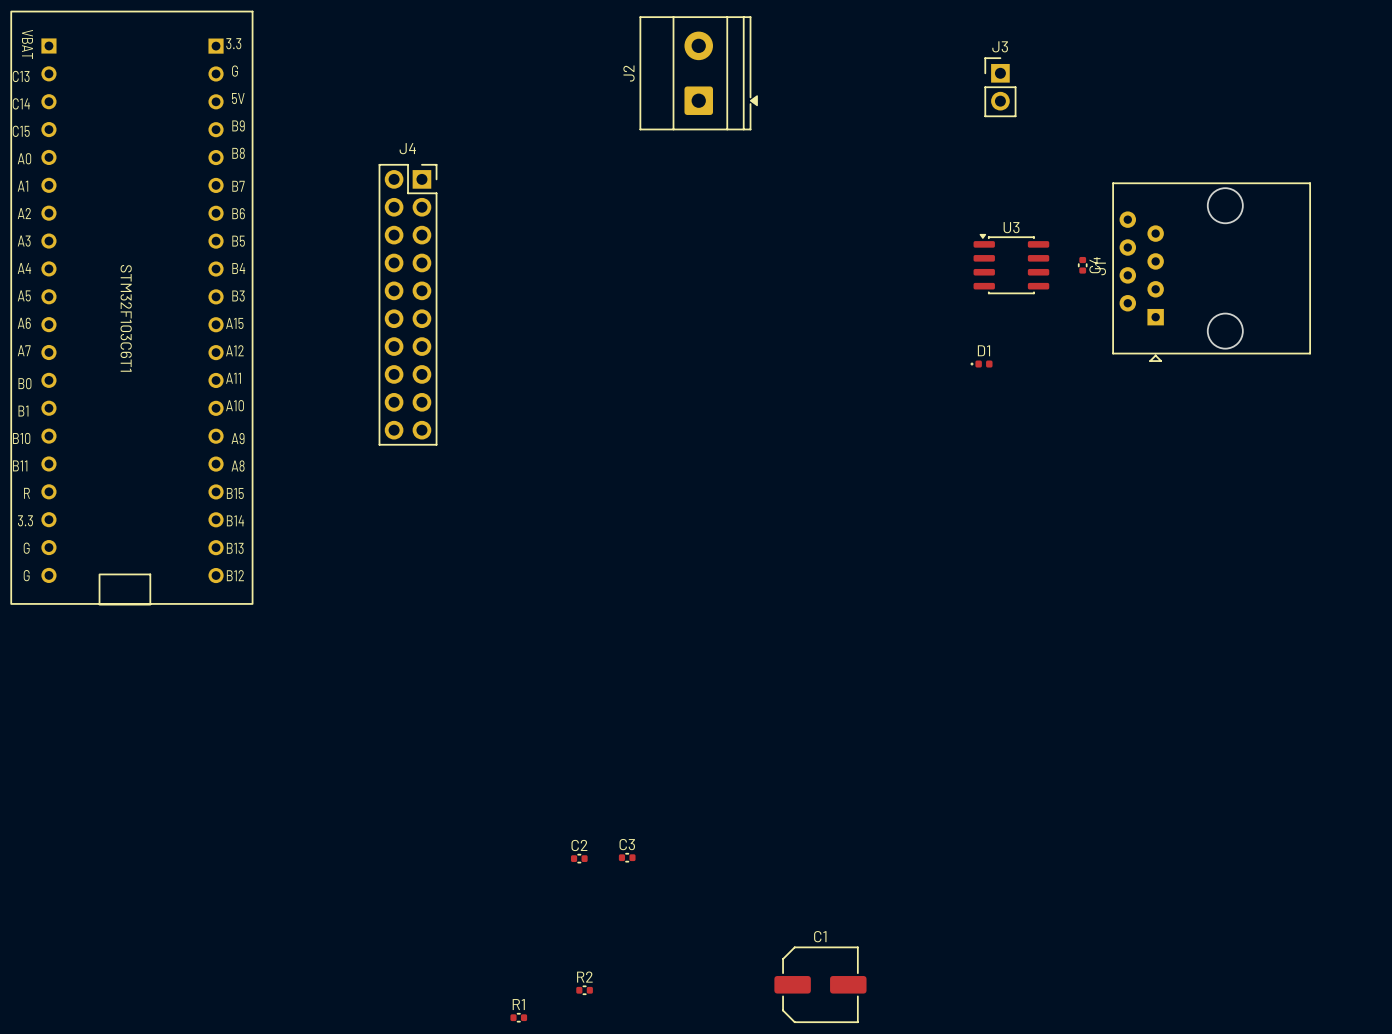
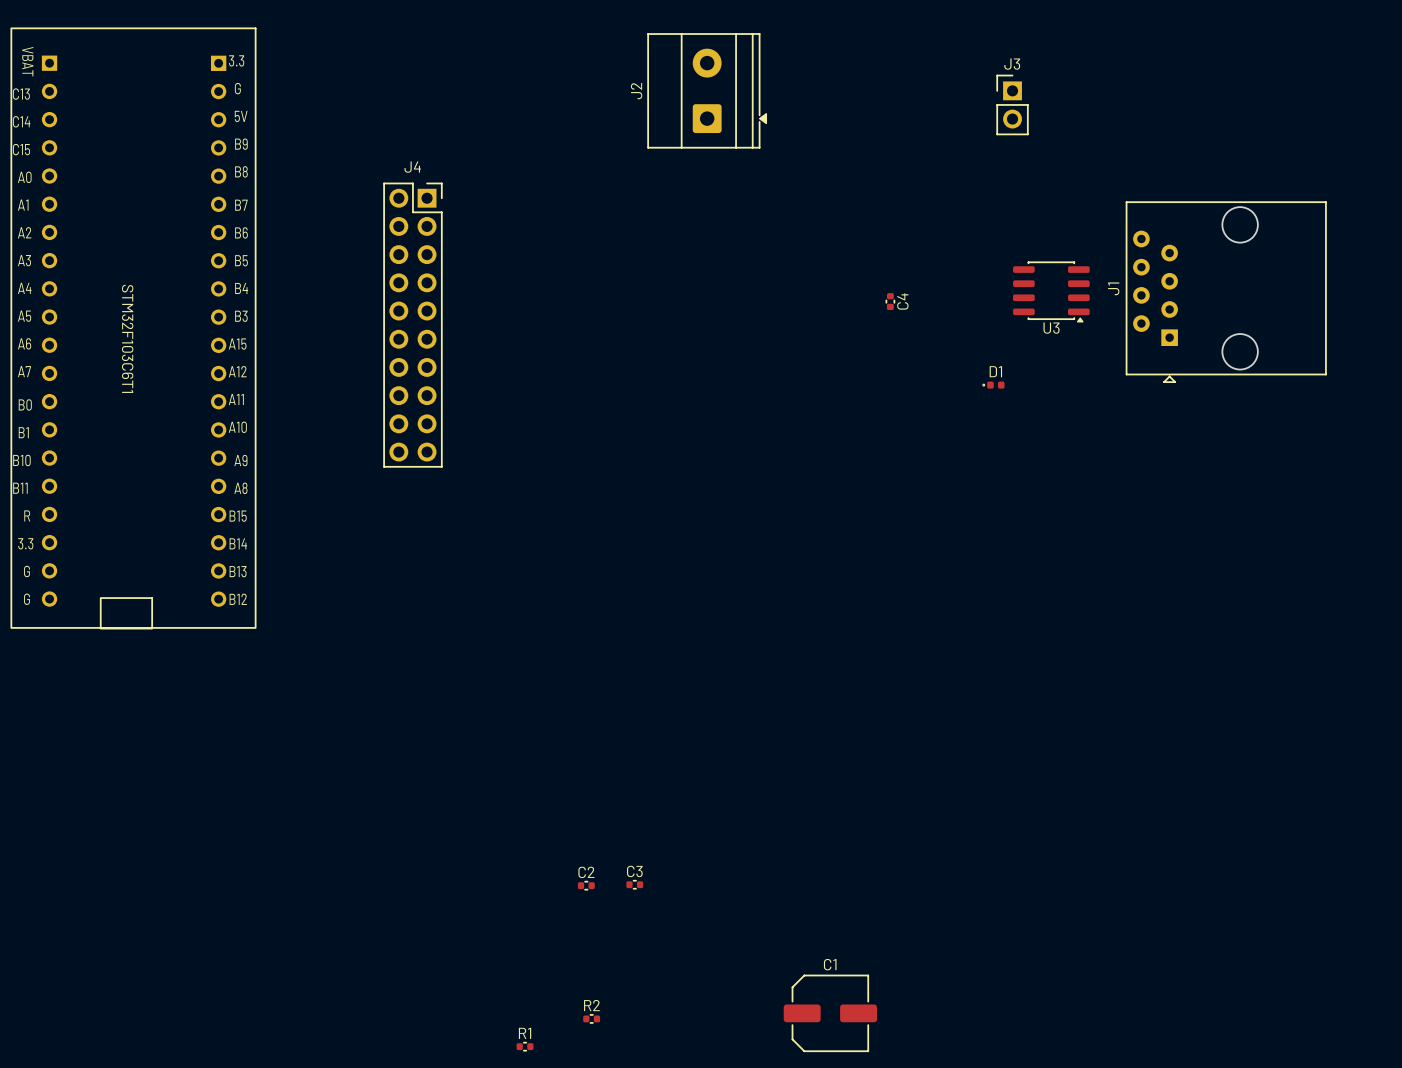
U3 rotation: 0° (1011, 263) -> 180° (1051, 292)
C4 position: (1082, 265) -> (890, 301)

